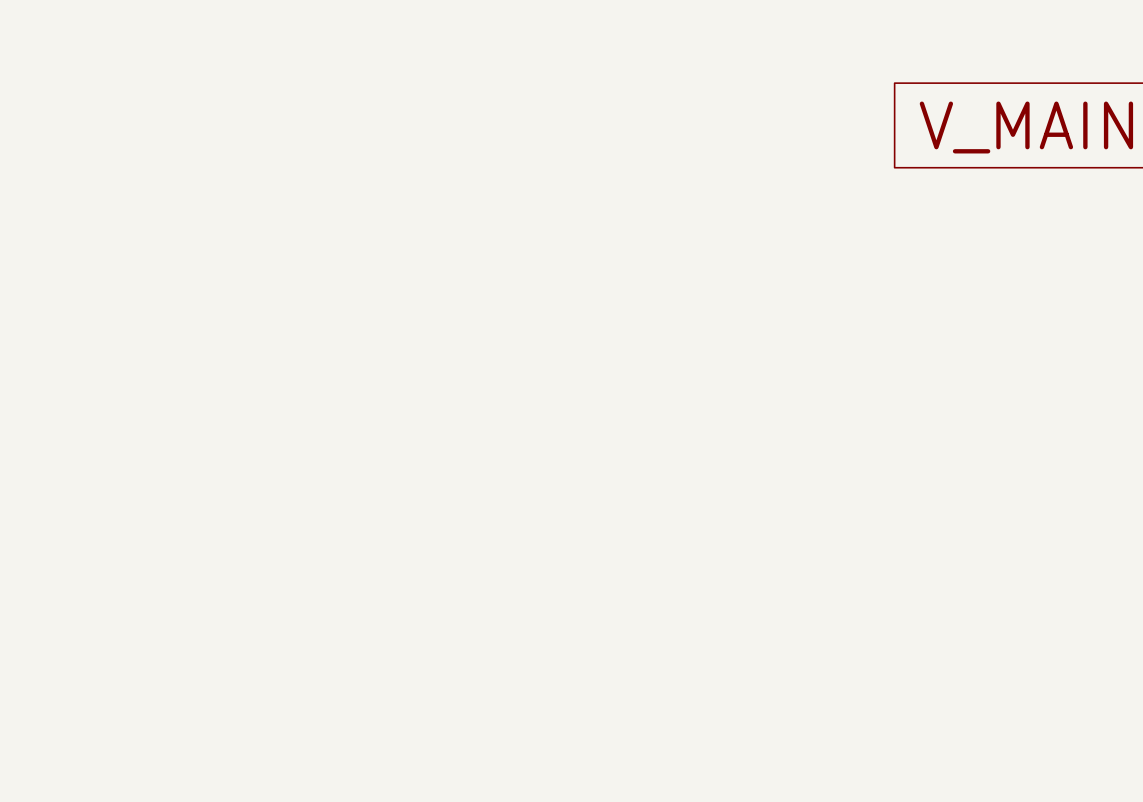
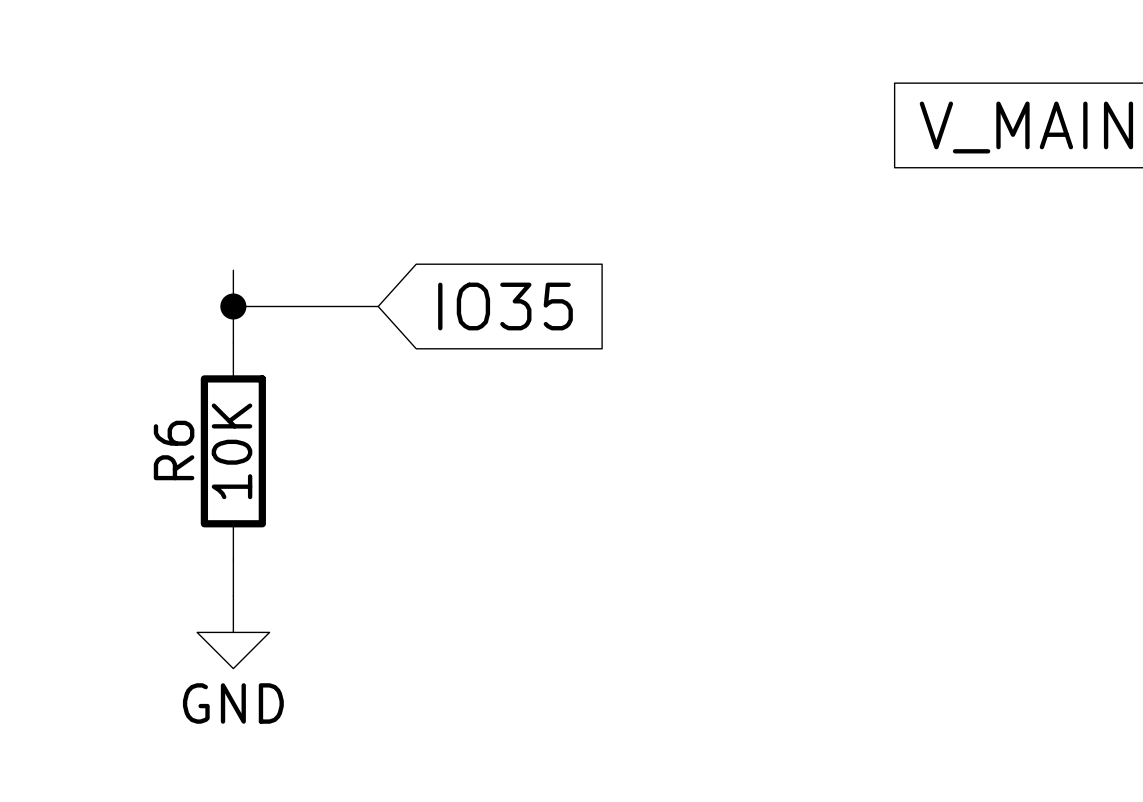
wire: none -> (233, 270) (233, 342)
wire: none -> (233, 306) (378, 306)
junction: none -> (233, 306)
global label: none -> IO35 (505, 306)
R6: none -> 10K (233, 451)
wire: none -> (233, 559) (233, 596)
power symbol: none -> GND (233, 632)

